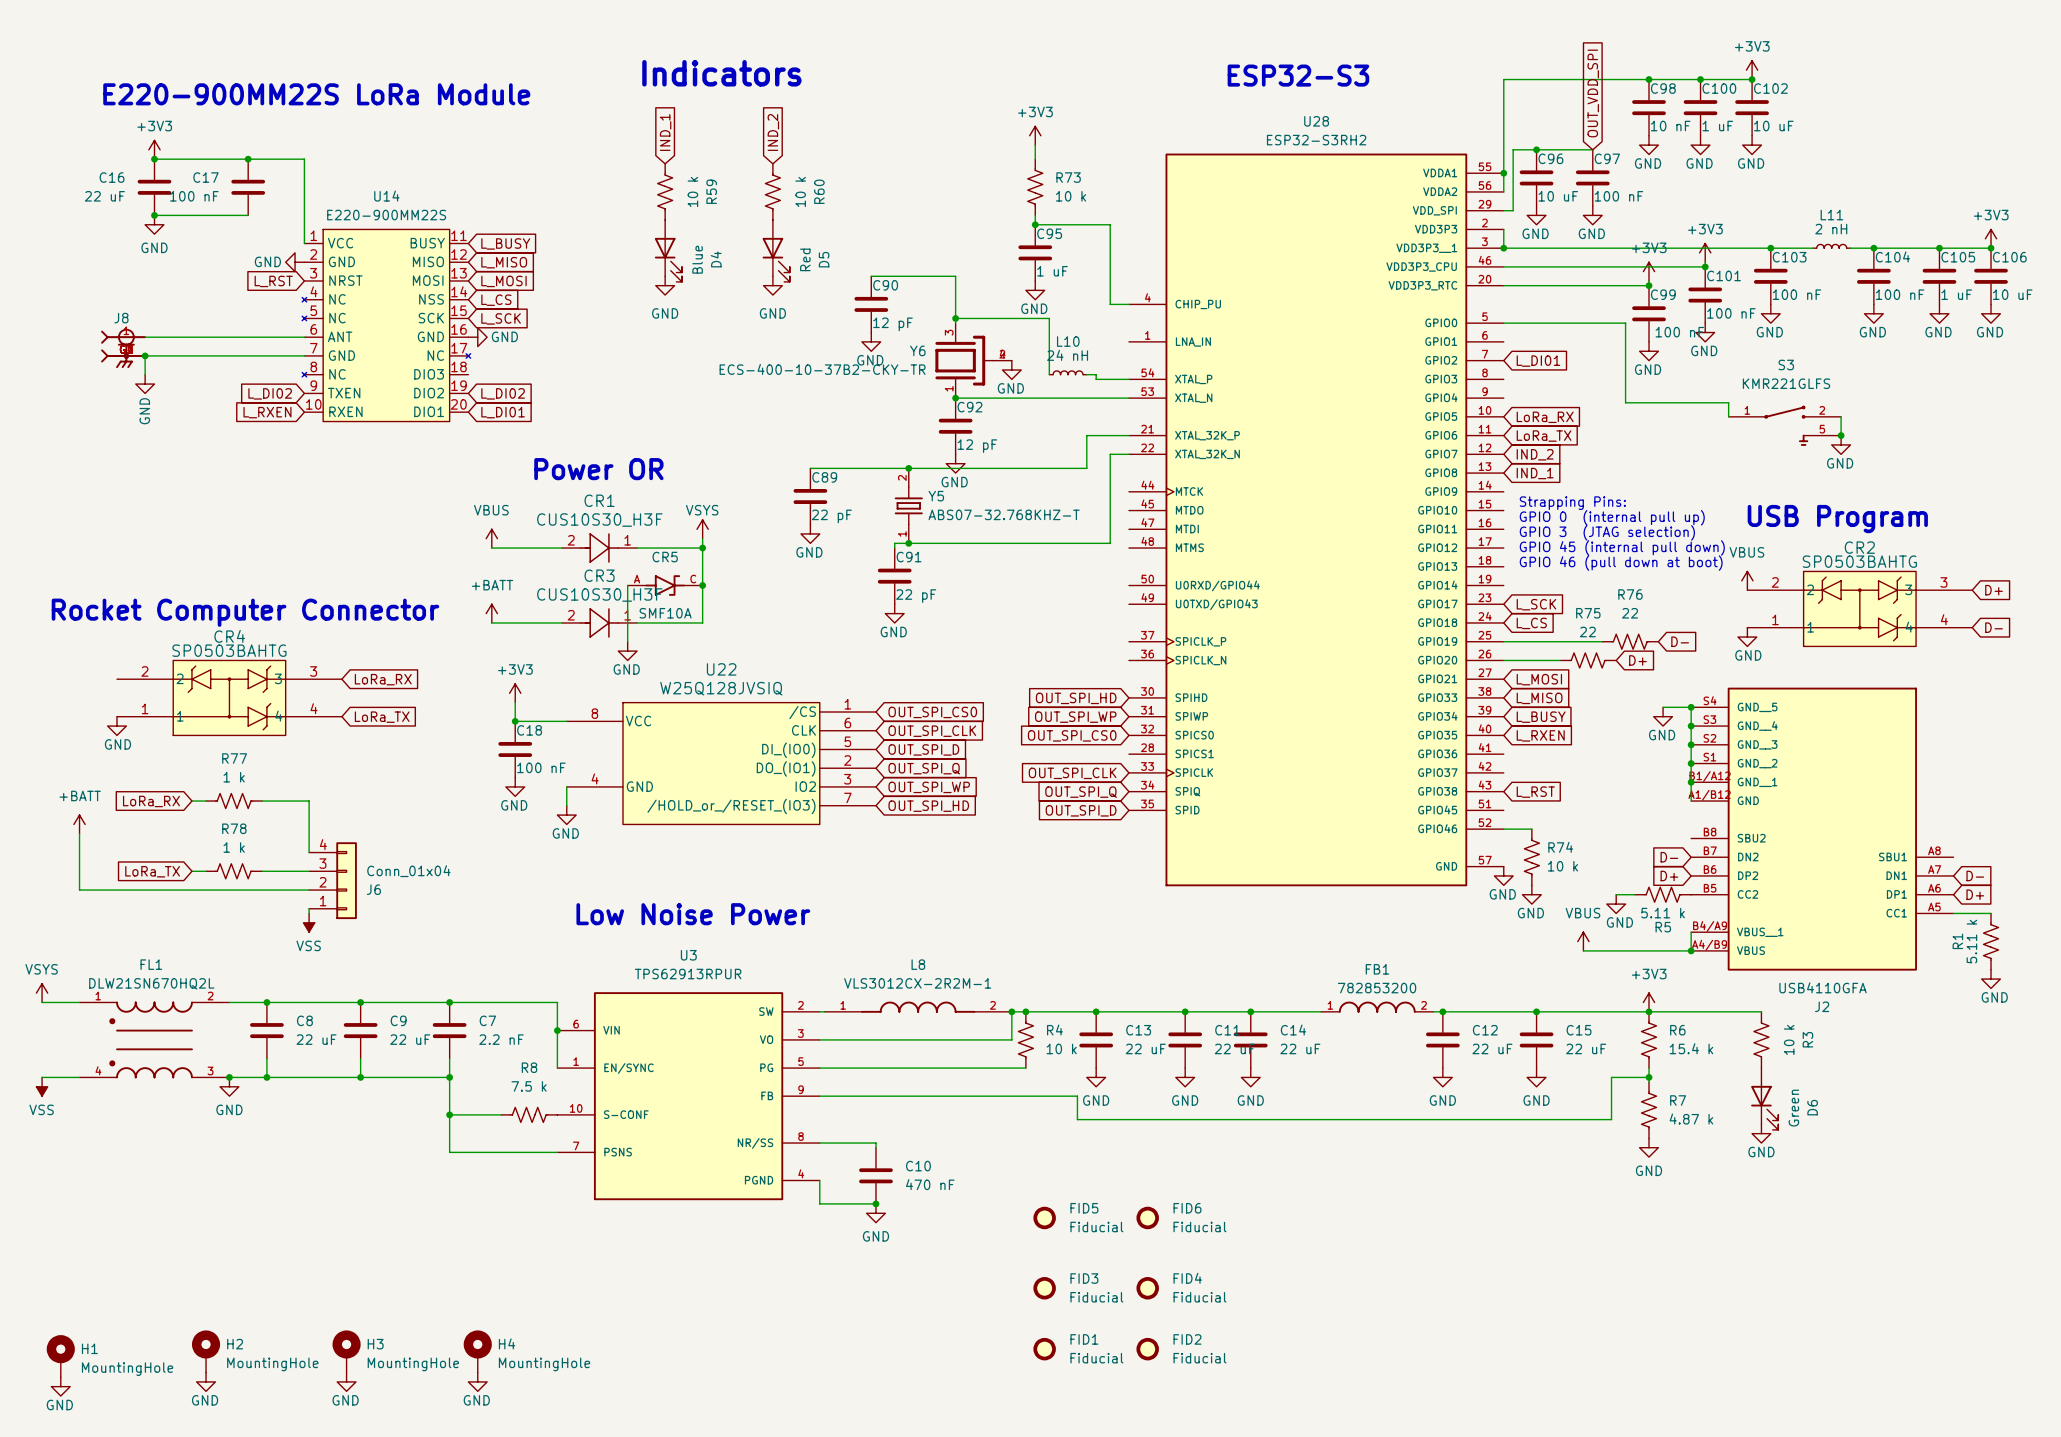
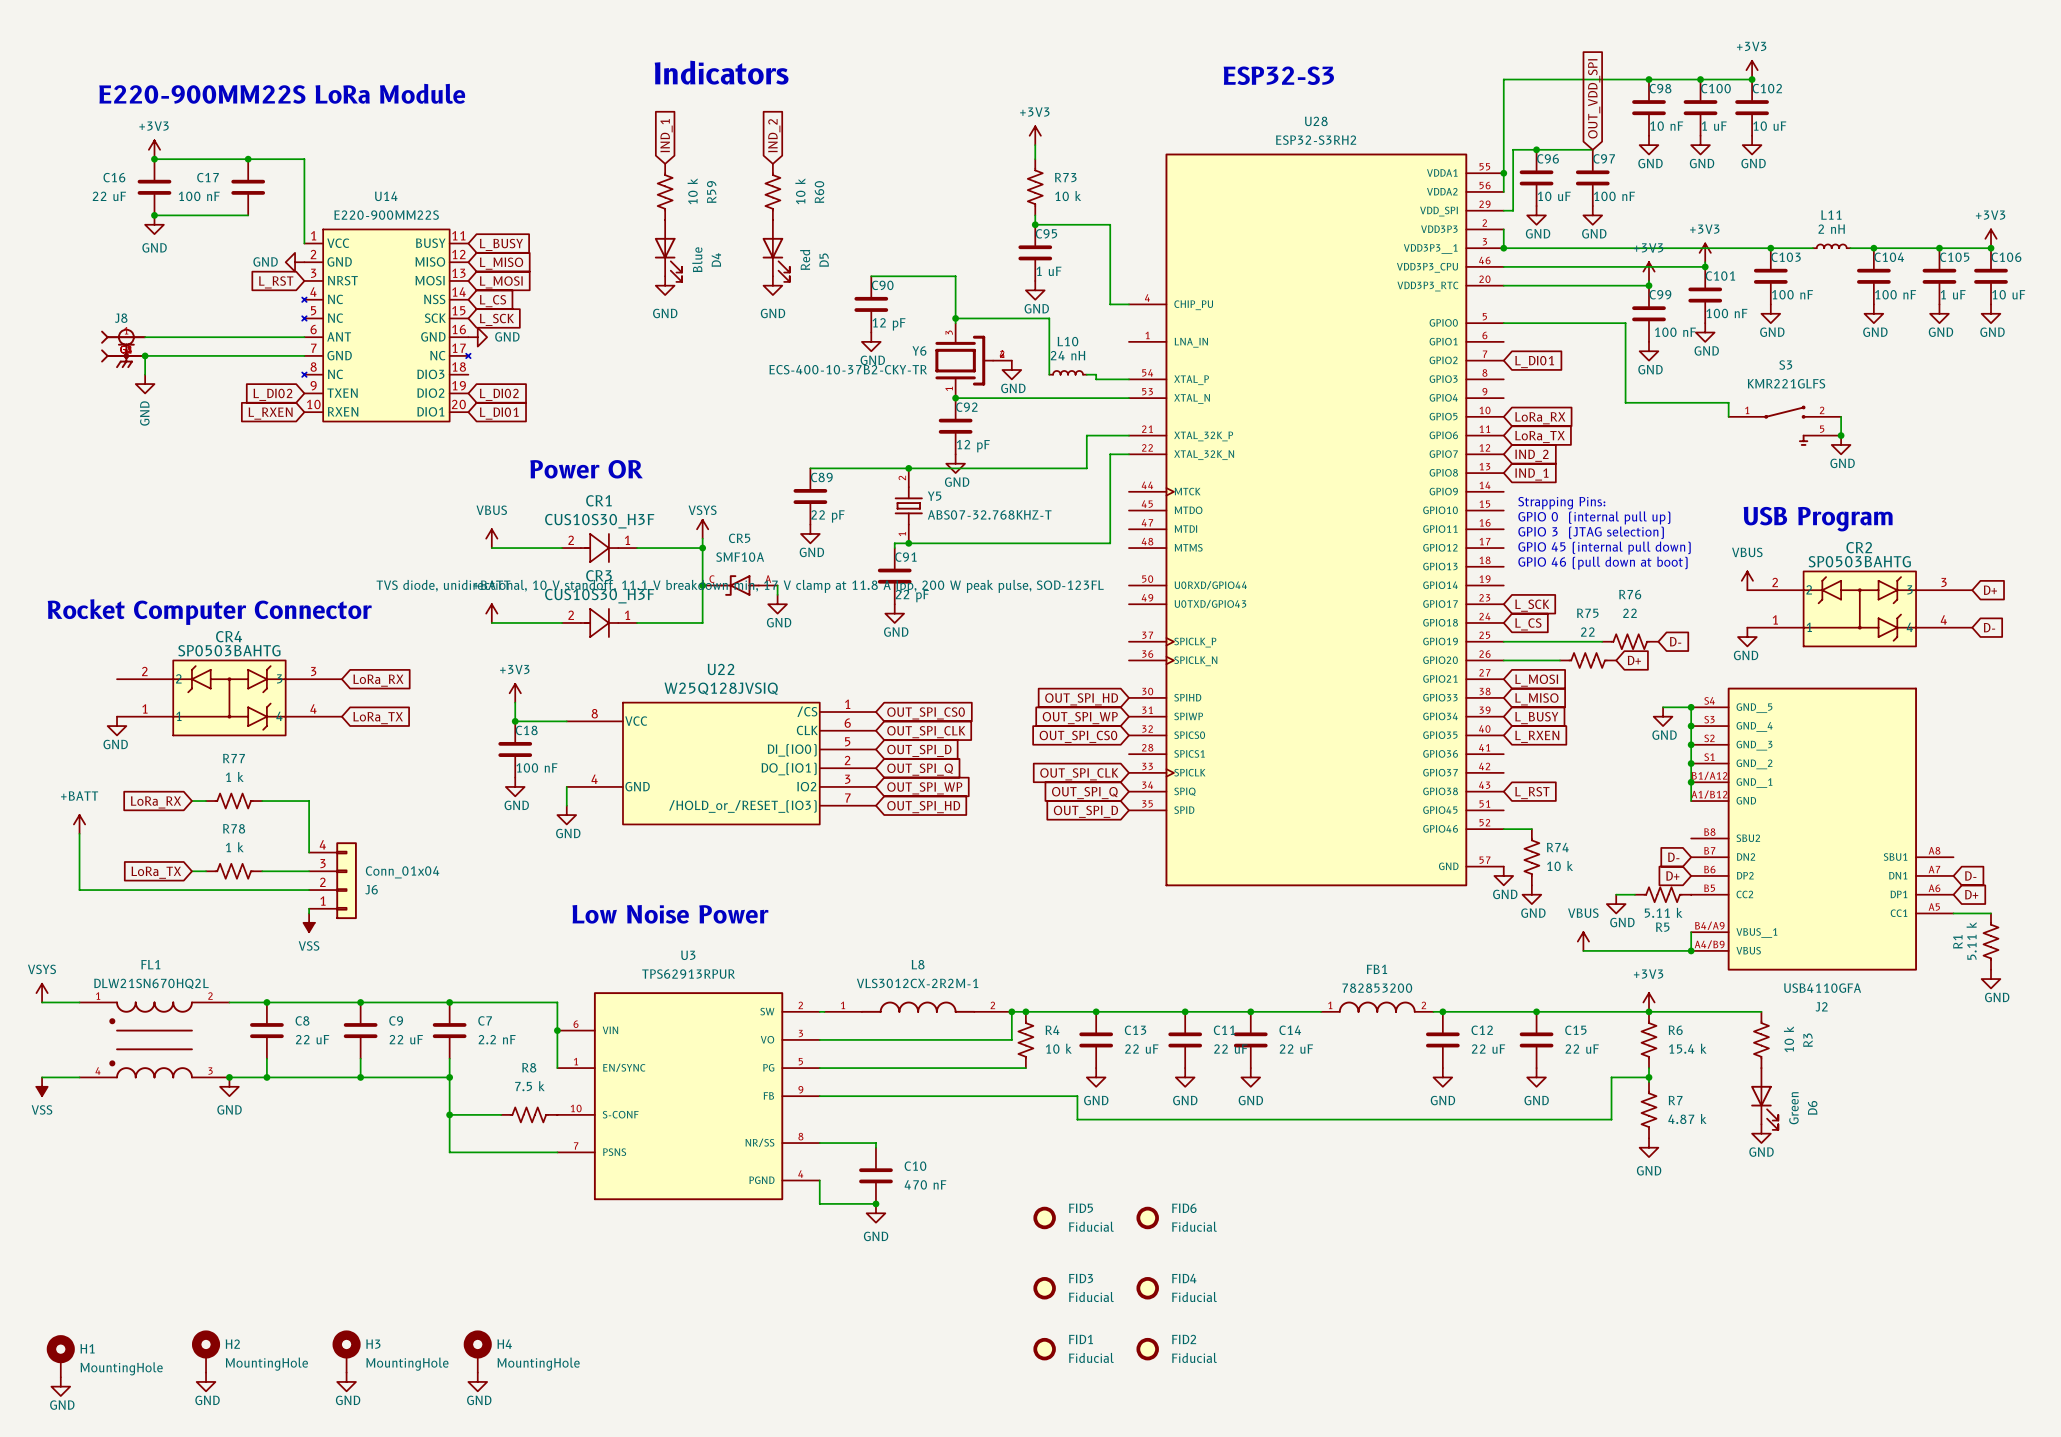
CR5 name position: CR5 (665, 557) -> CR5 (739, 538)
wire: (627, 585) (627, 641) -> none
CR5 rotation: 0° (665, 585) -> 180° (740, 585)
CR5 position: (665, 585) -> (740, 585)
wire: none -> (777, 585) (777, 594)
CR5 text: none -> TVS diode, unidirectional, 10 V standoff, 11.1 V breakdown min, 17 V clamp at 11.8 A Ipp, 200 W peak pulse, SOD-123FL (740, 586)
power symbol position: GND (627, 651) -> GND (777, 604)

